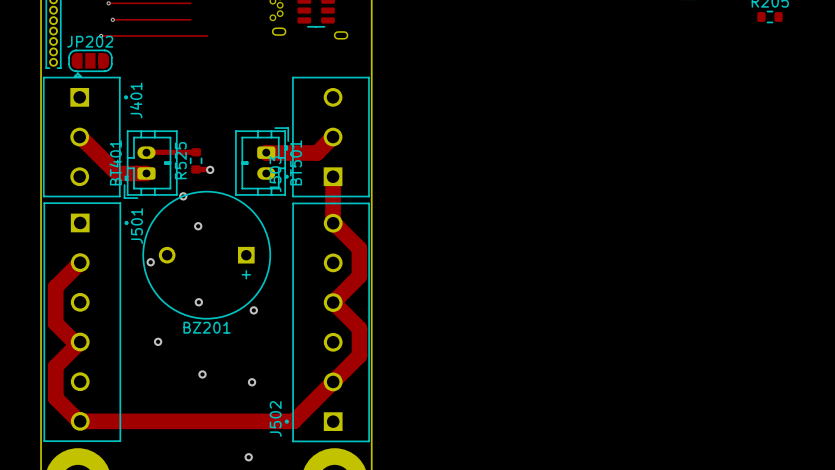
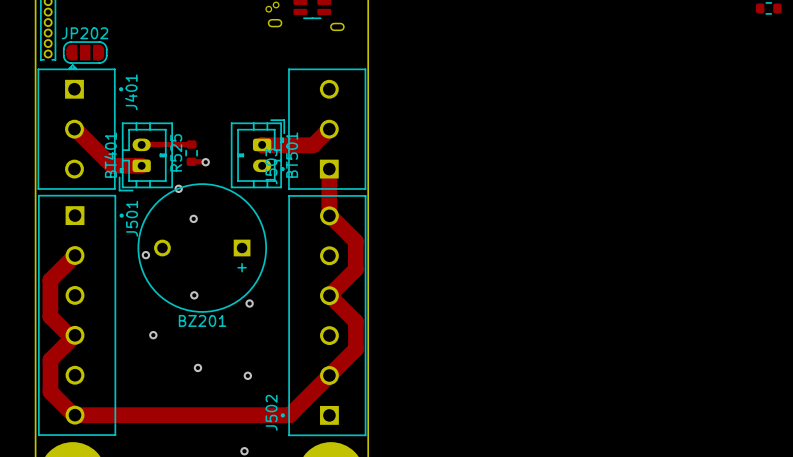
track: (112, 19) (190, 19) -> none
via: (112, 19) -> none
track: (101, 35) (207, 35) -> none
via: (101, 35) -> none

